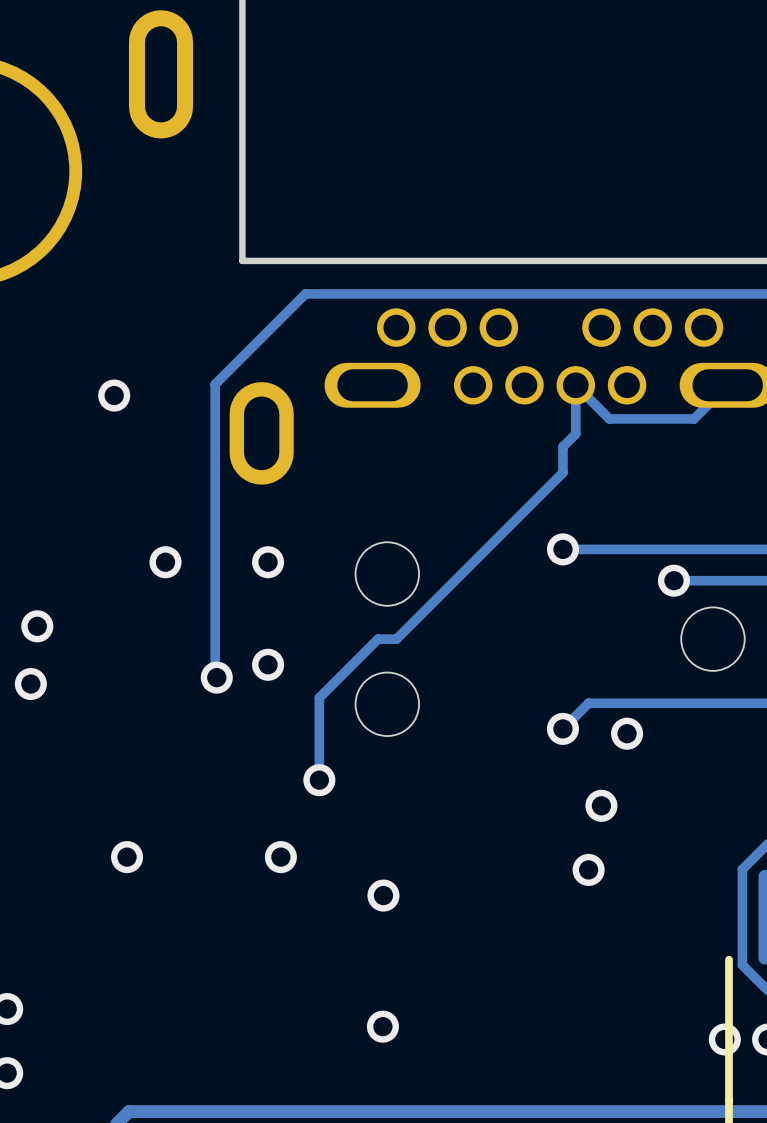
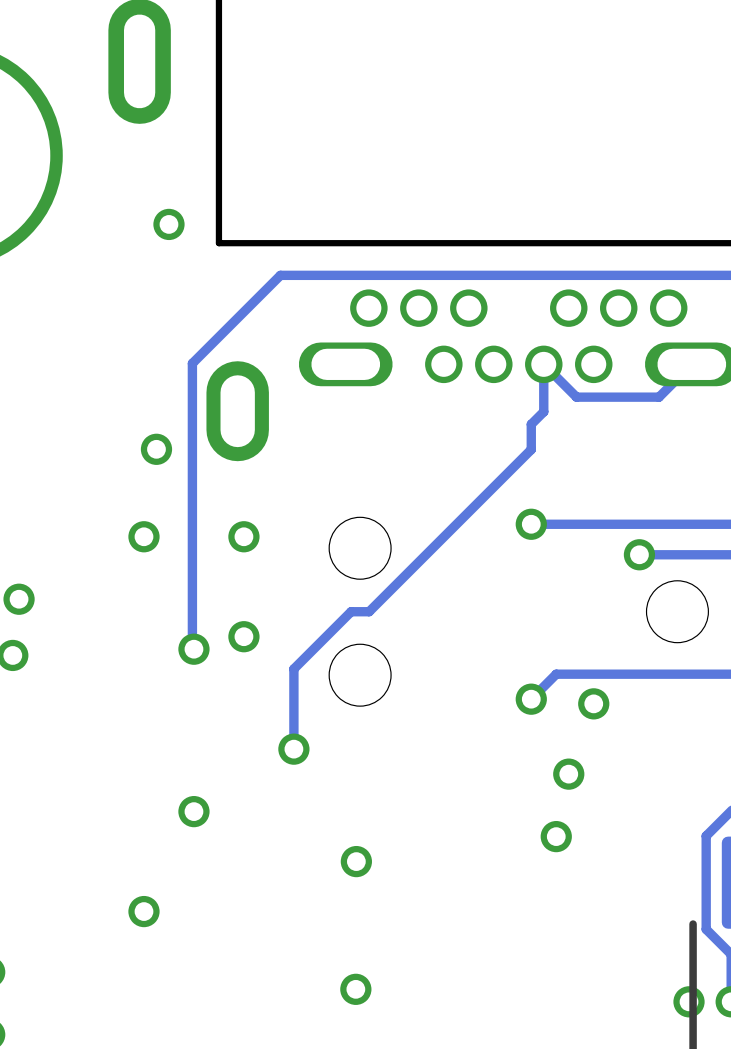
via: none -> (168, 224)
via: (114, 395) -> none
via: none -> (156, 449)
via: none -> (193, 811)
via: (127, 857) -> none
via: (280, 857) -> none
via: none -> (143, 911)

